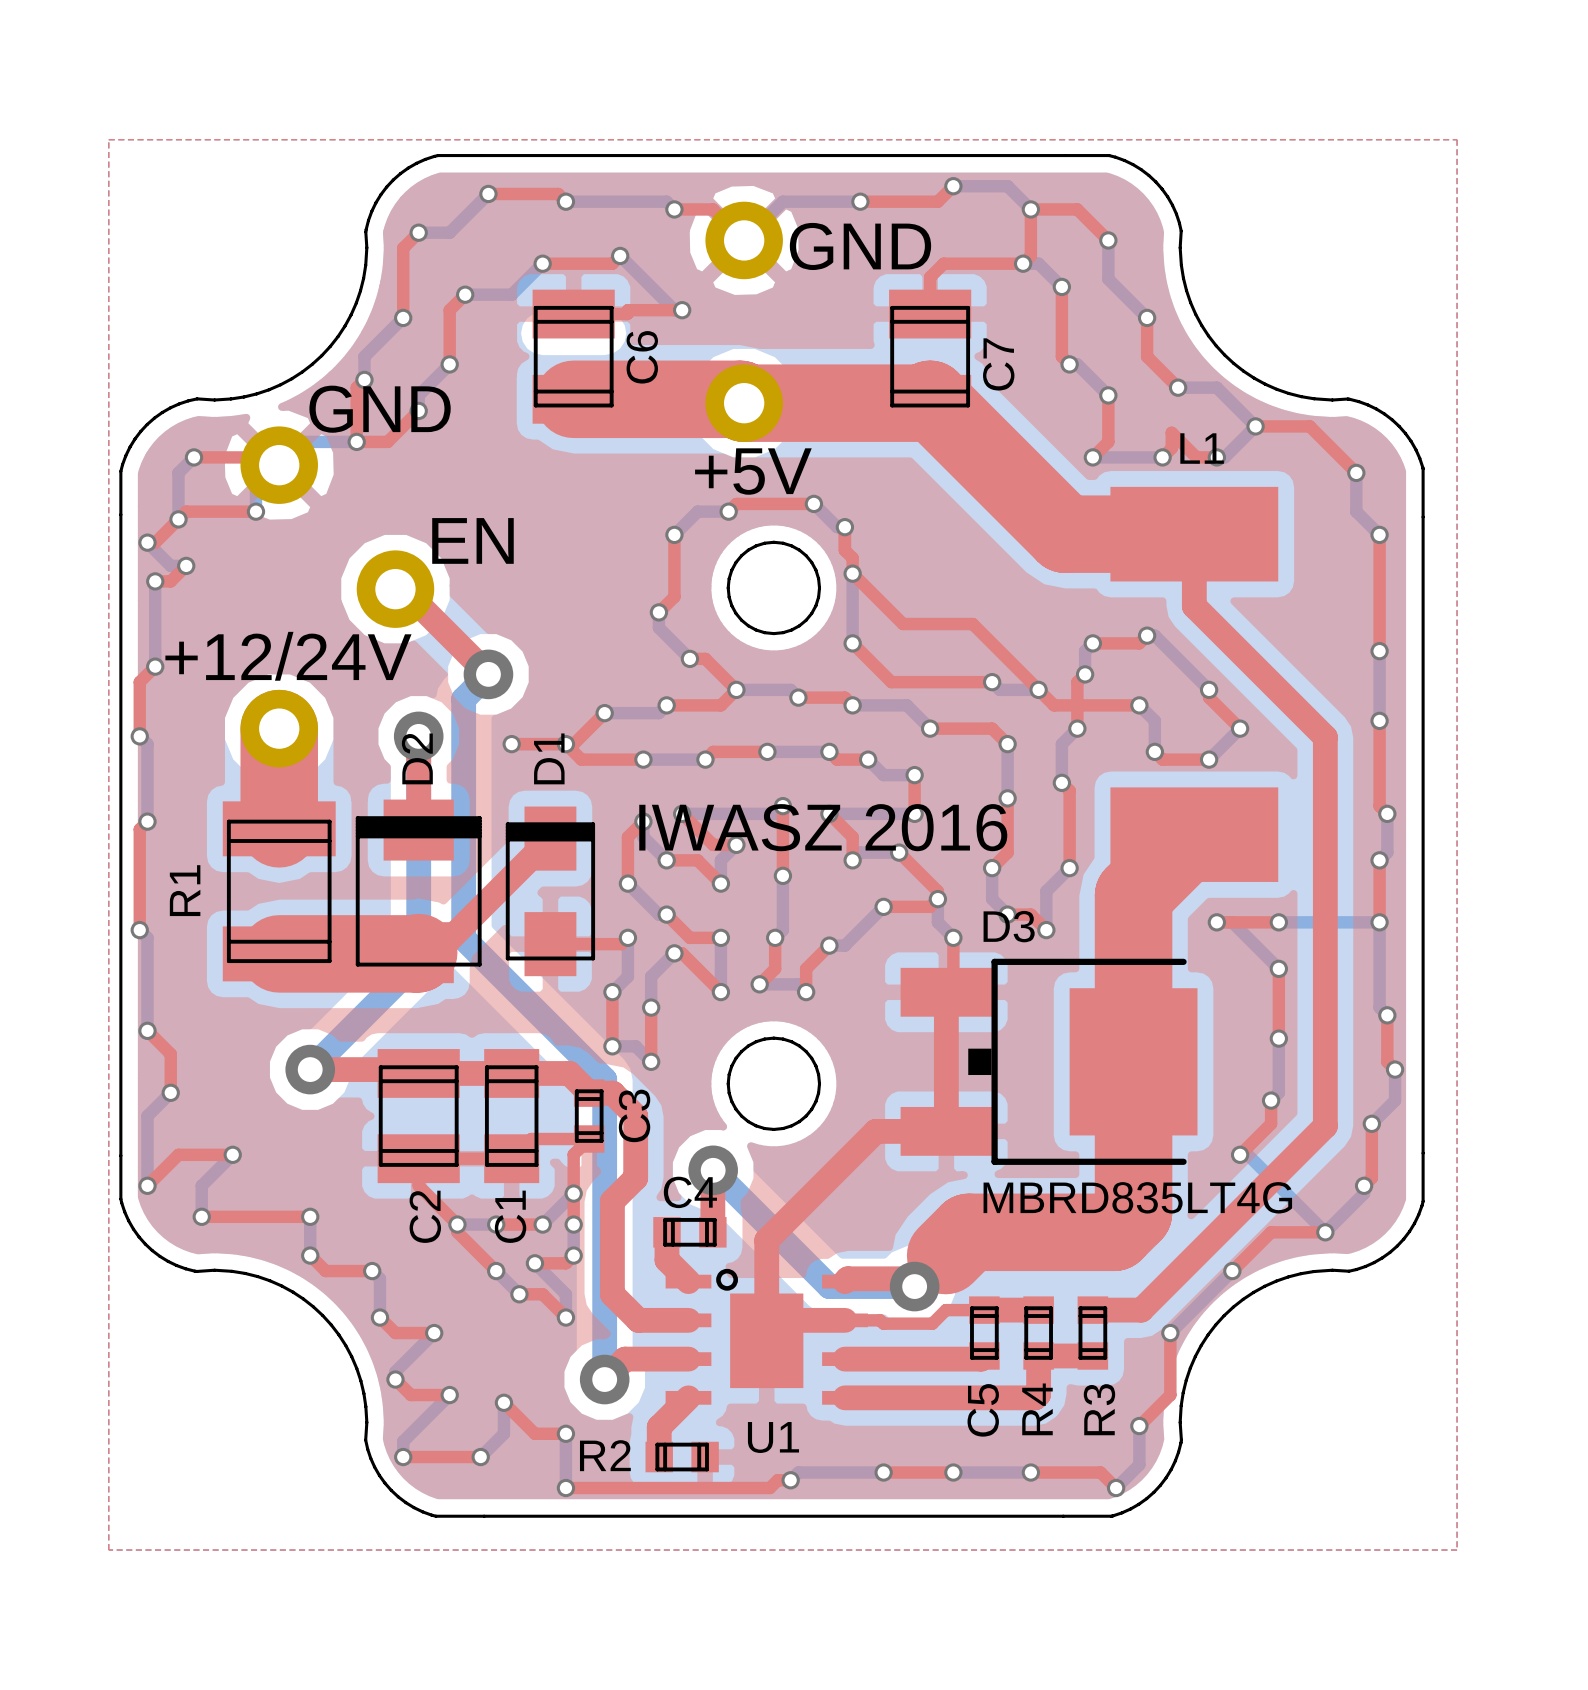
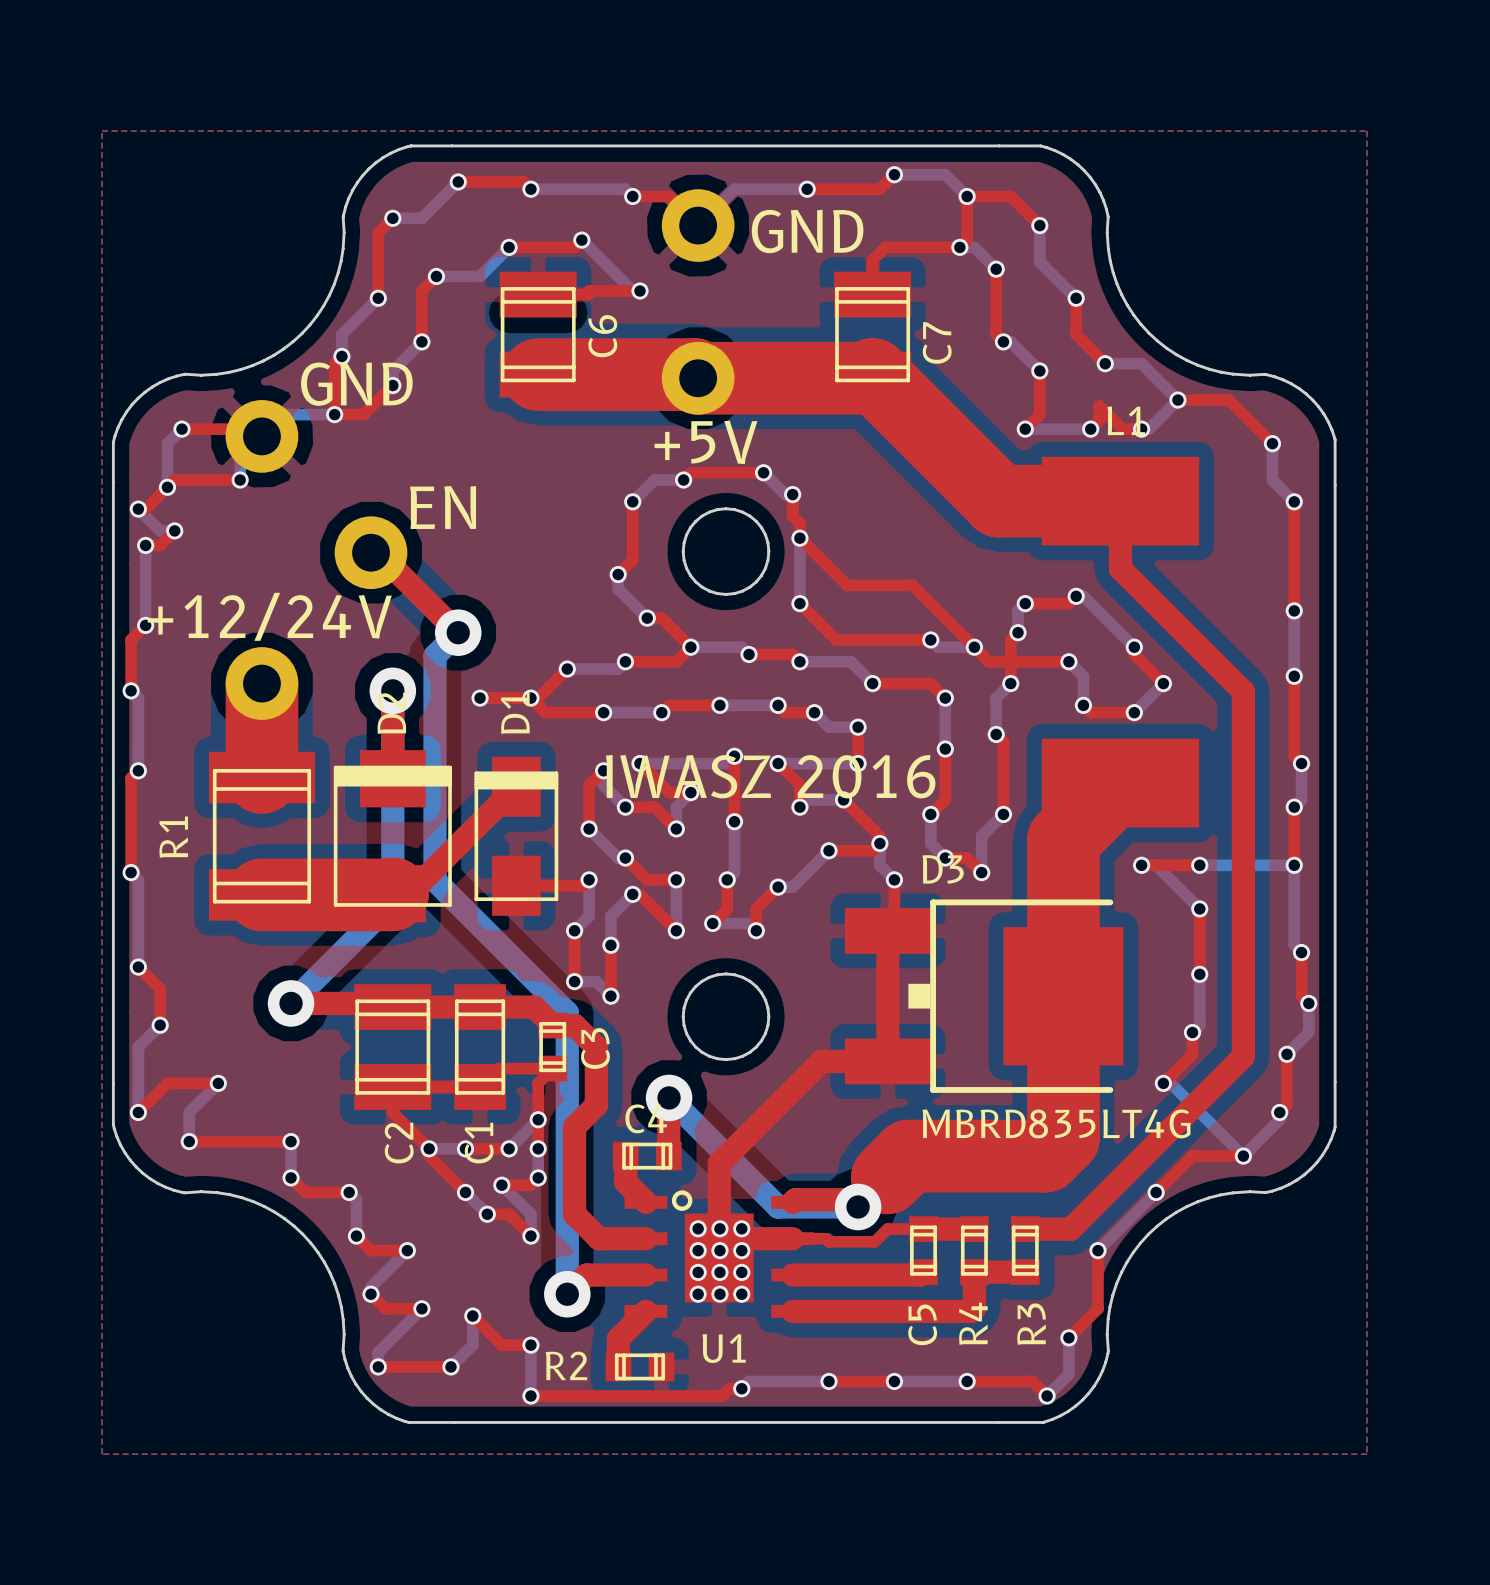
via: none -> (698, 1228)
via: none -> (719, 1228)
via: none -> (741, 1228)
via: none -> (698, 1250)
via: none -> (719, 1250)
via: none -> (741, 1250)
via: none -> (698, 1272)
via: none -> (719, 1272)
via: none -> (741, 1272)
via: none -> (698, 1294)
via: none -> (719, 1294)
via: none -> (741, 1294)

